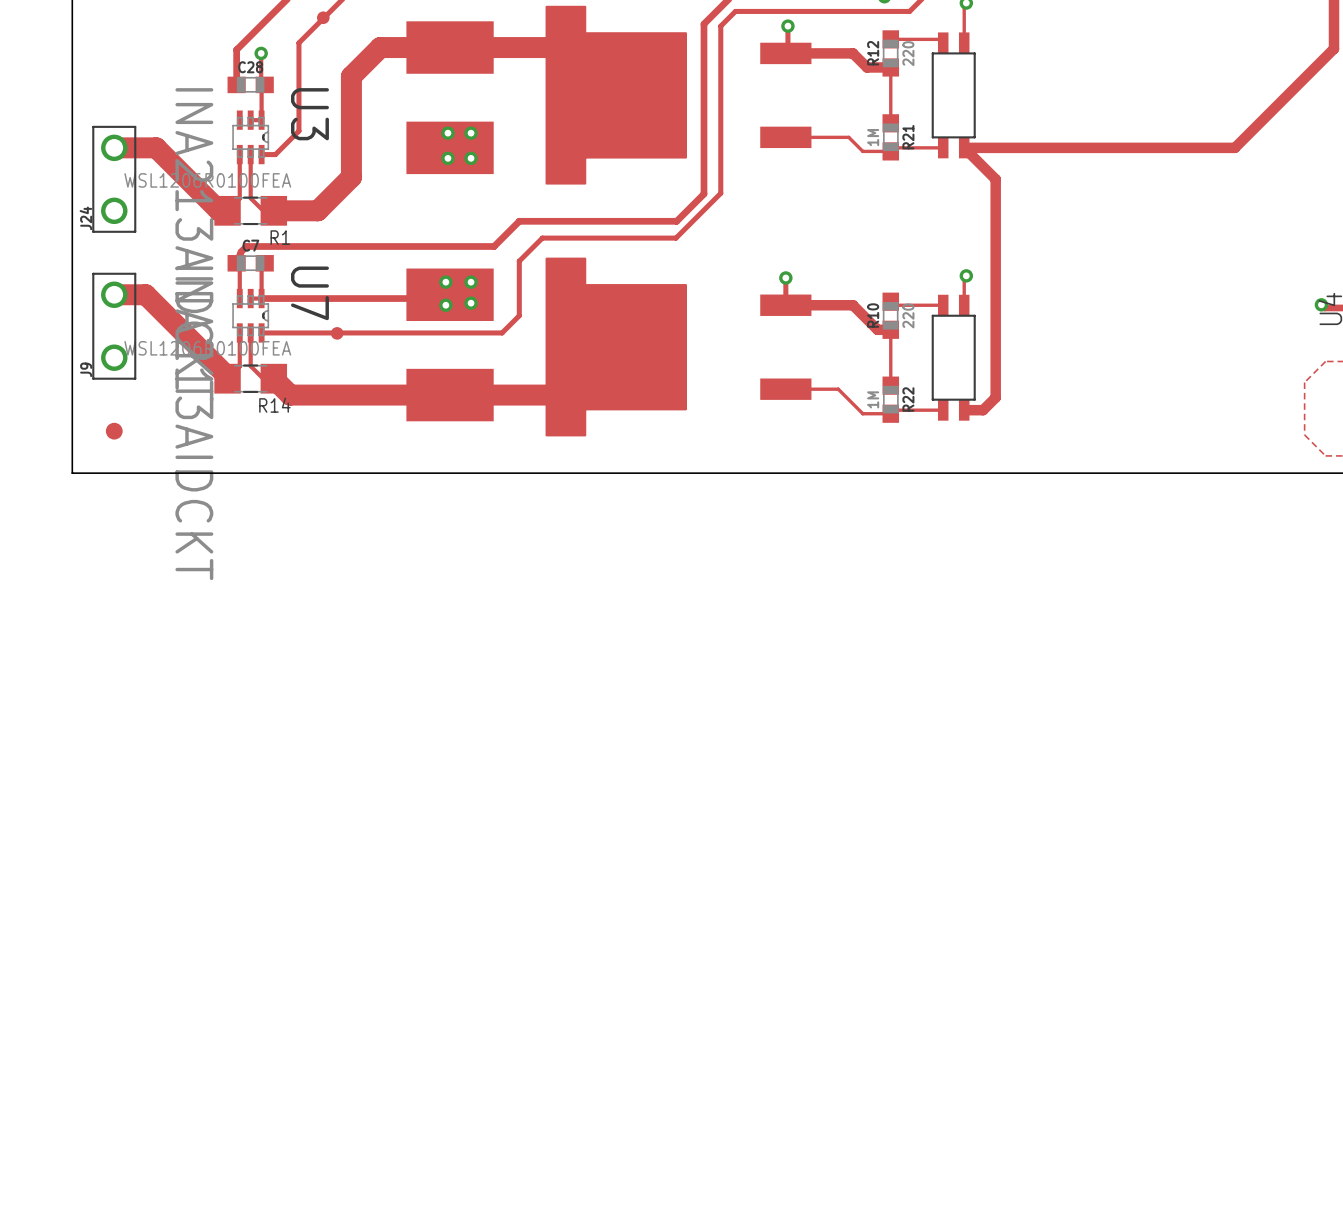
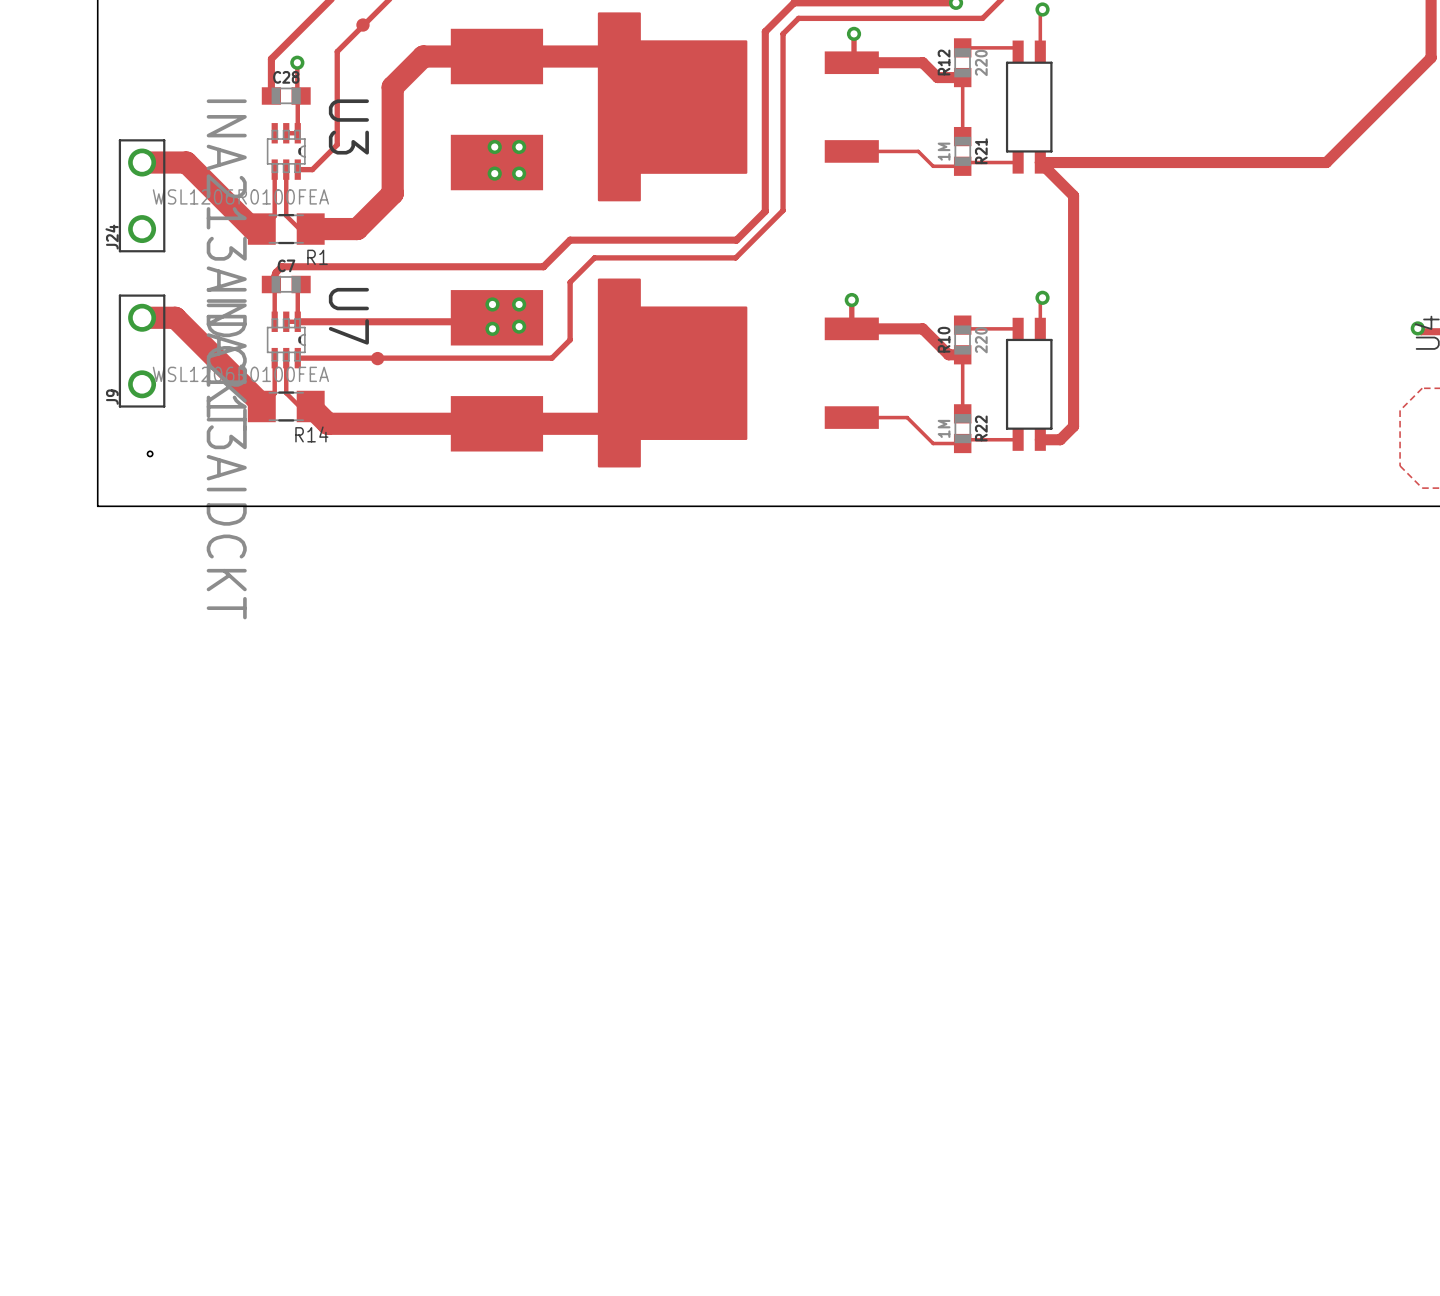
hole: none -> (150, 453)
part: (114, 431) -> none

